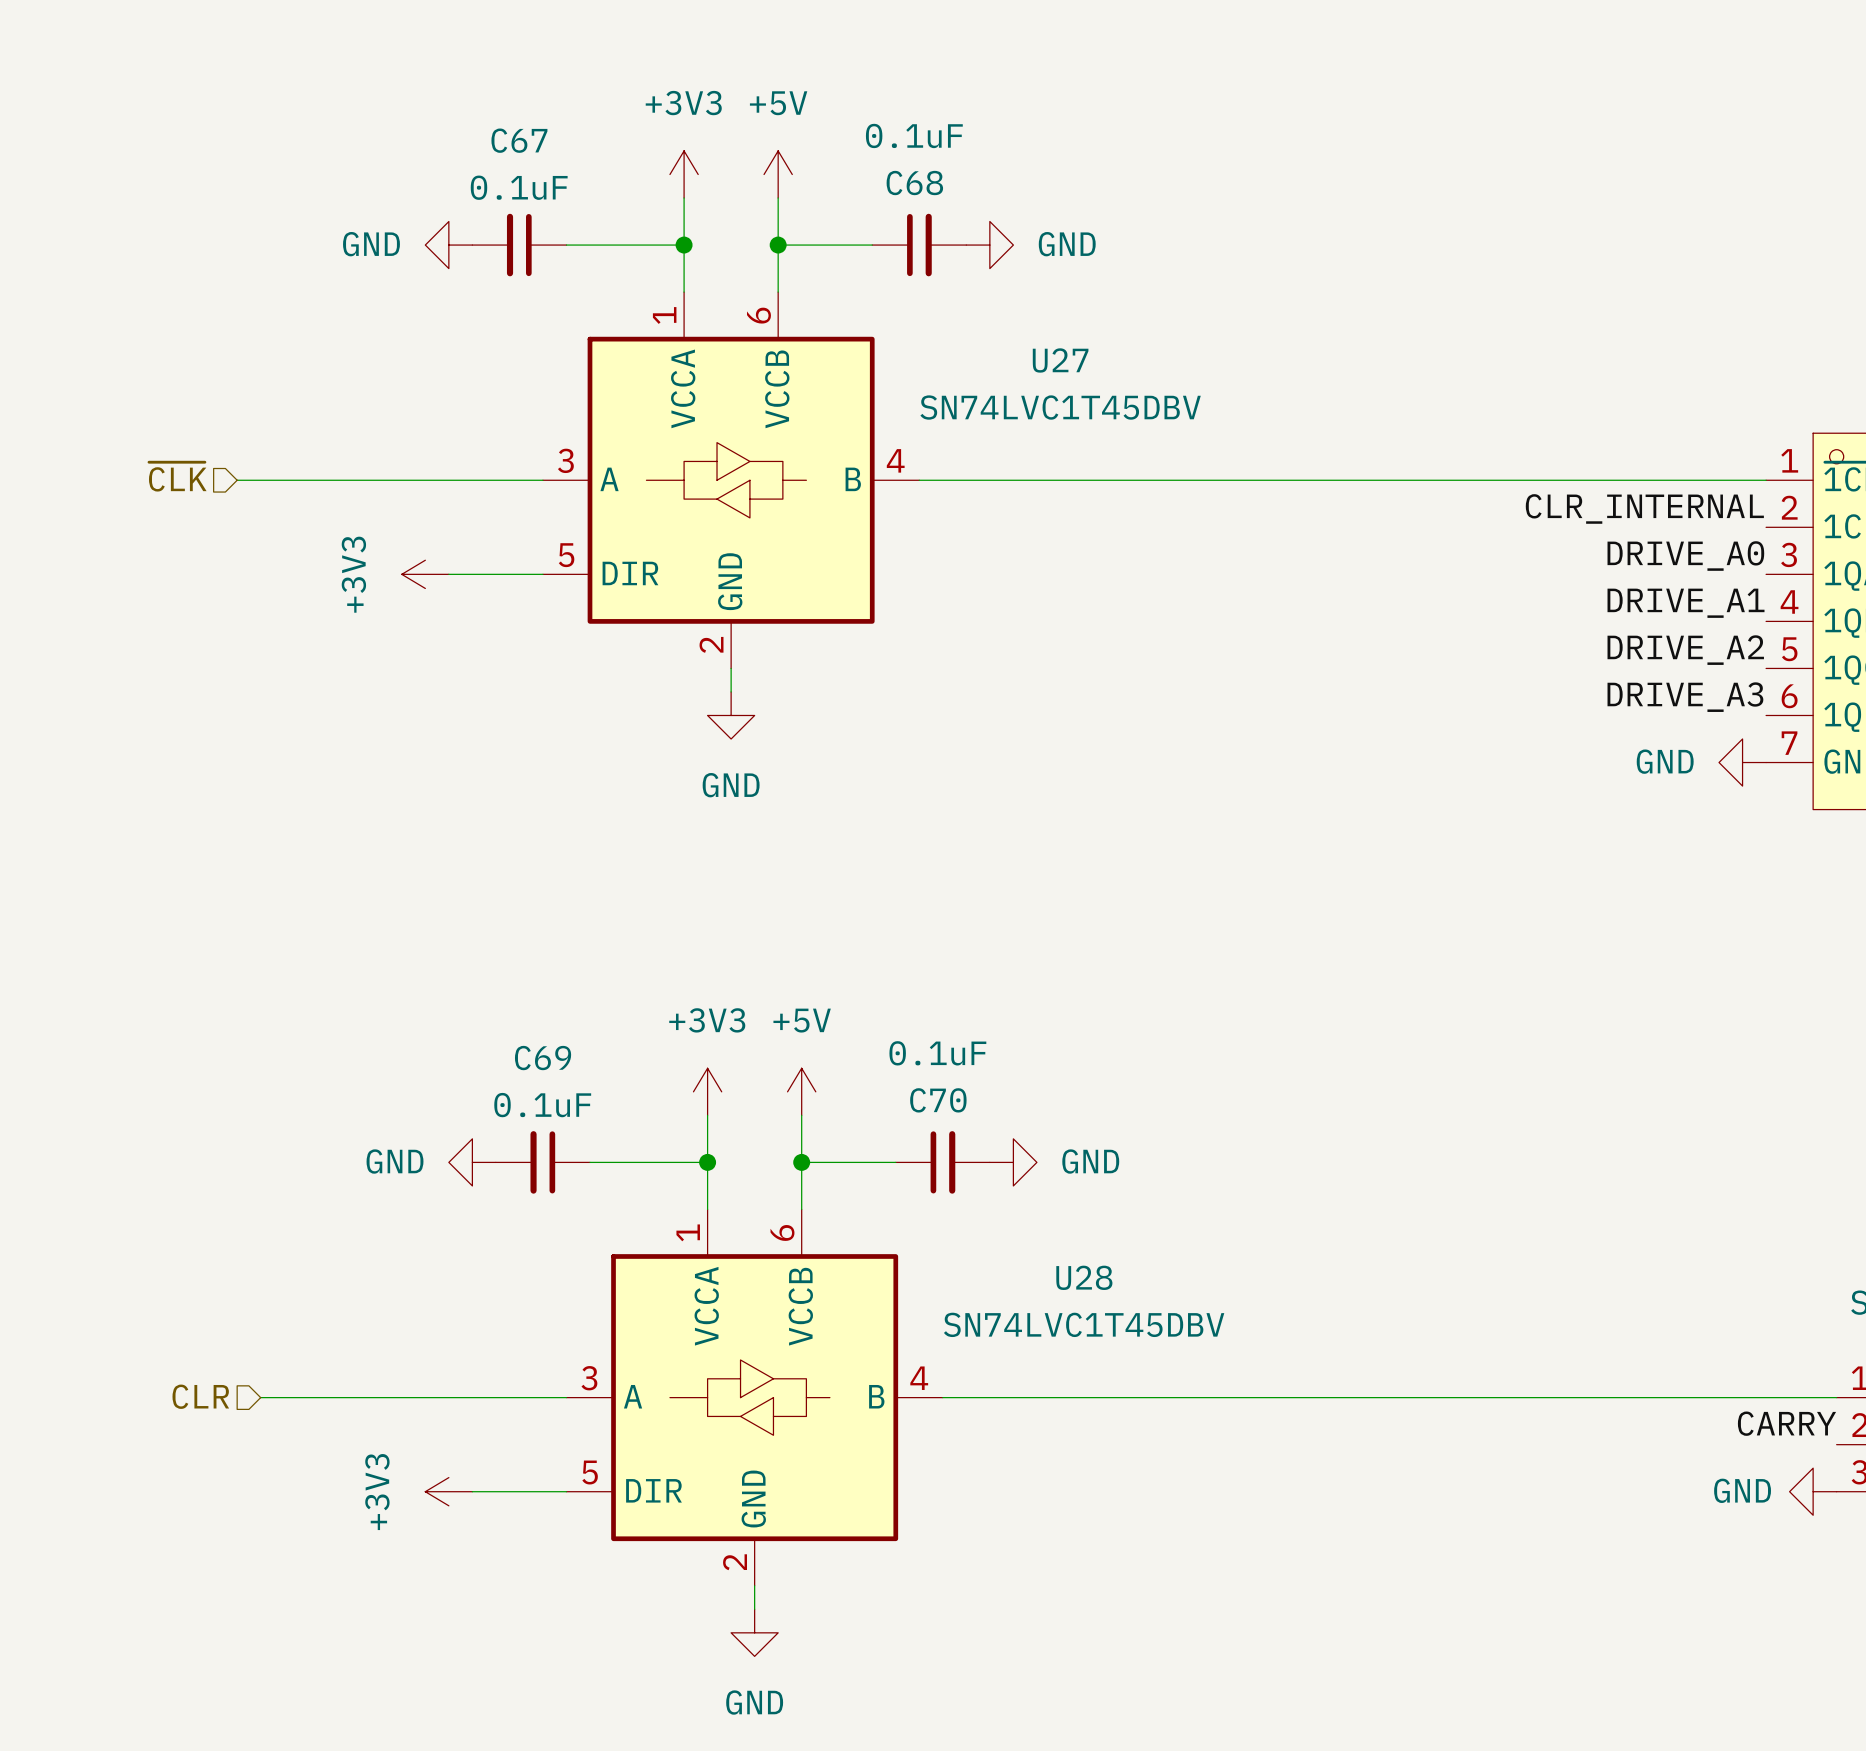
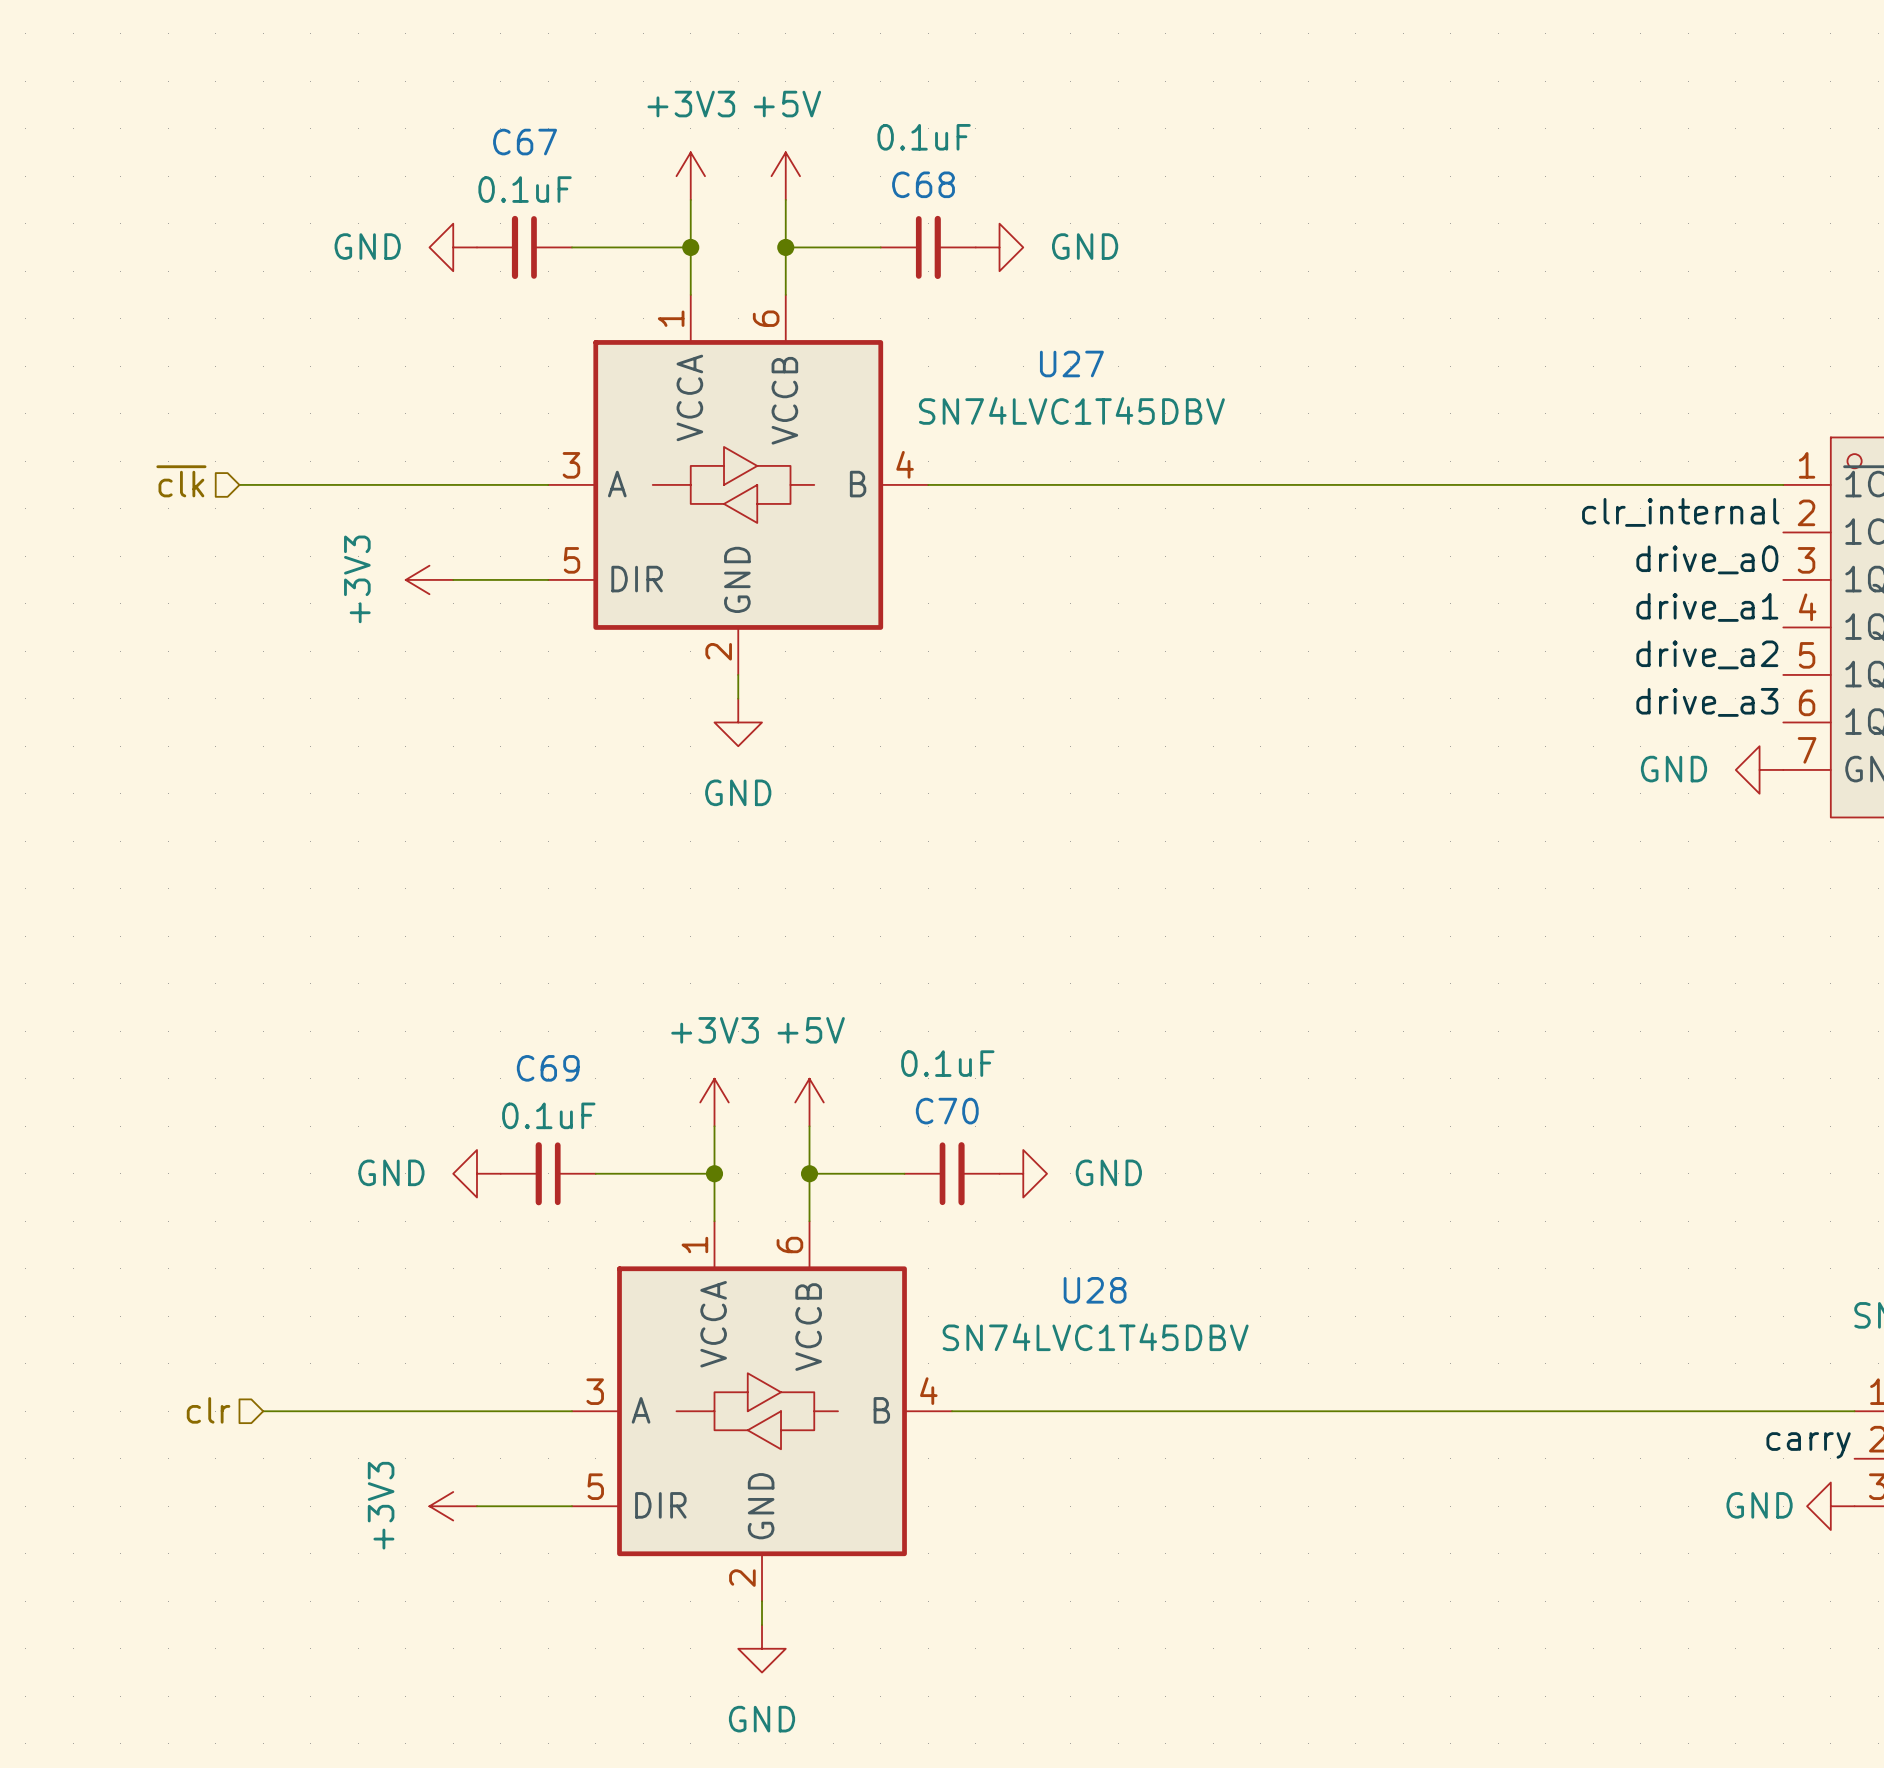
hierarchical label: ~{CLK} (177, 476) -> ~{clk} (181, 481)
label: CLR_INTERNAL (1644, 508) -> clr_internal (1680, 512)
label: DRIVE_A0 (1685, 556) -> drive_a0 (1707, 559)
label: DRIVE_A1 (1686, 603) -> drive_a1 (1707, 607)
label: DRIVE_A2 (1685, 650) -> drive_a2 (1707, 654)
label: DRIVE_A3 (1685, 697) -> drive_a3 (1707, 702)
hierarchical label: CLR (200, 1396) -> clr (208, 1410)
label: CARRY (1786, 1423) -> carry (1808, 1445)

